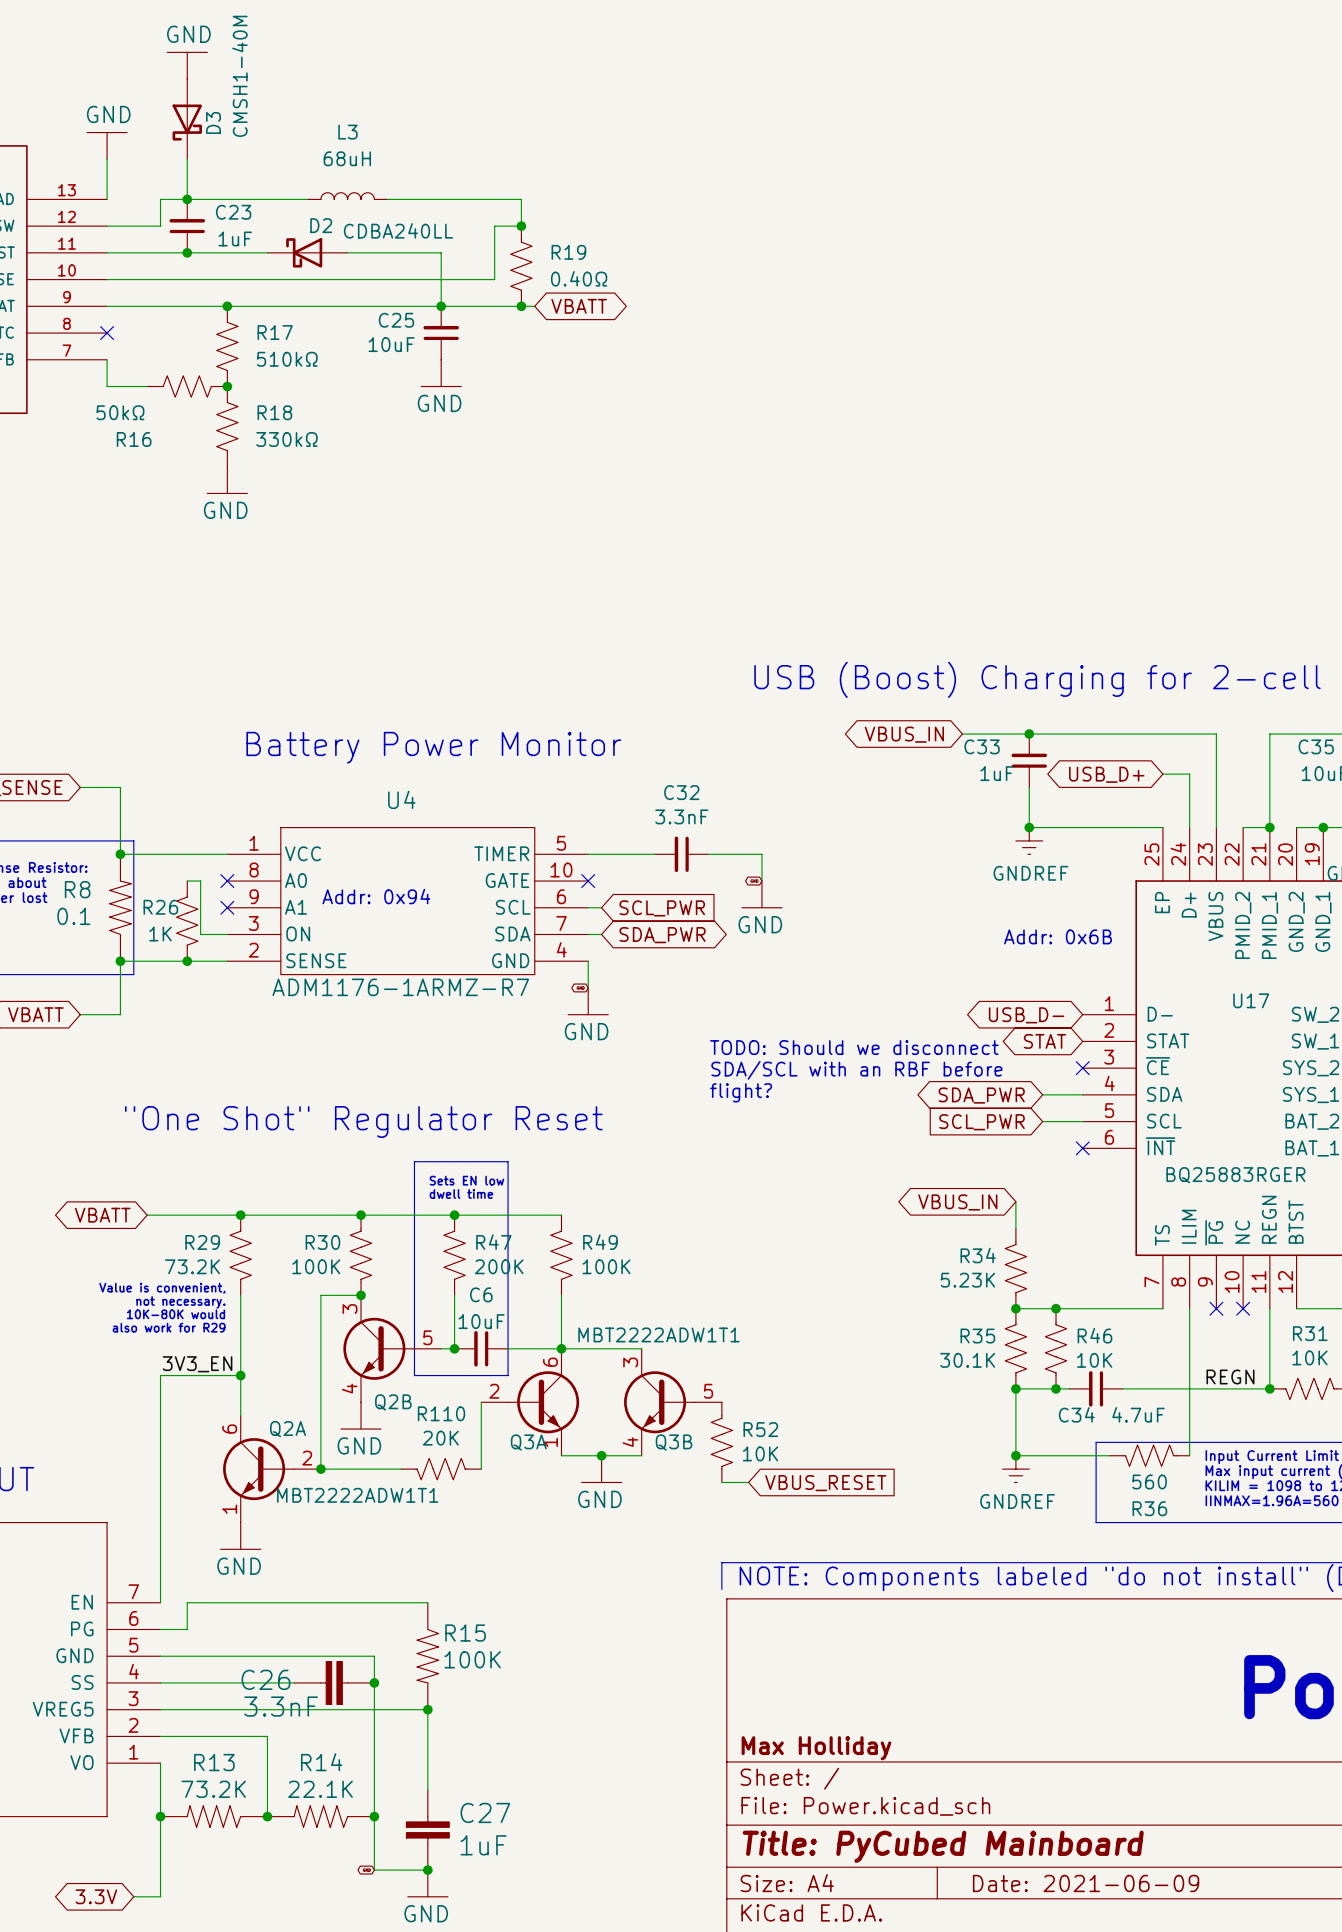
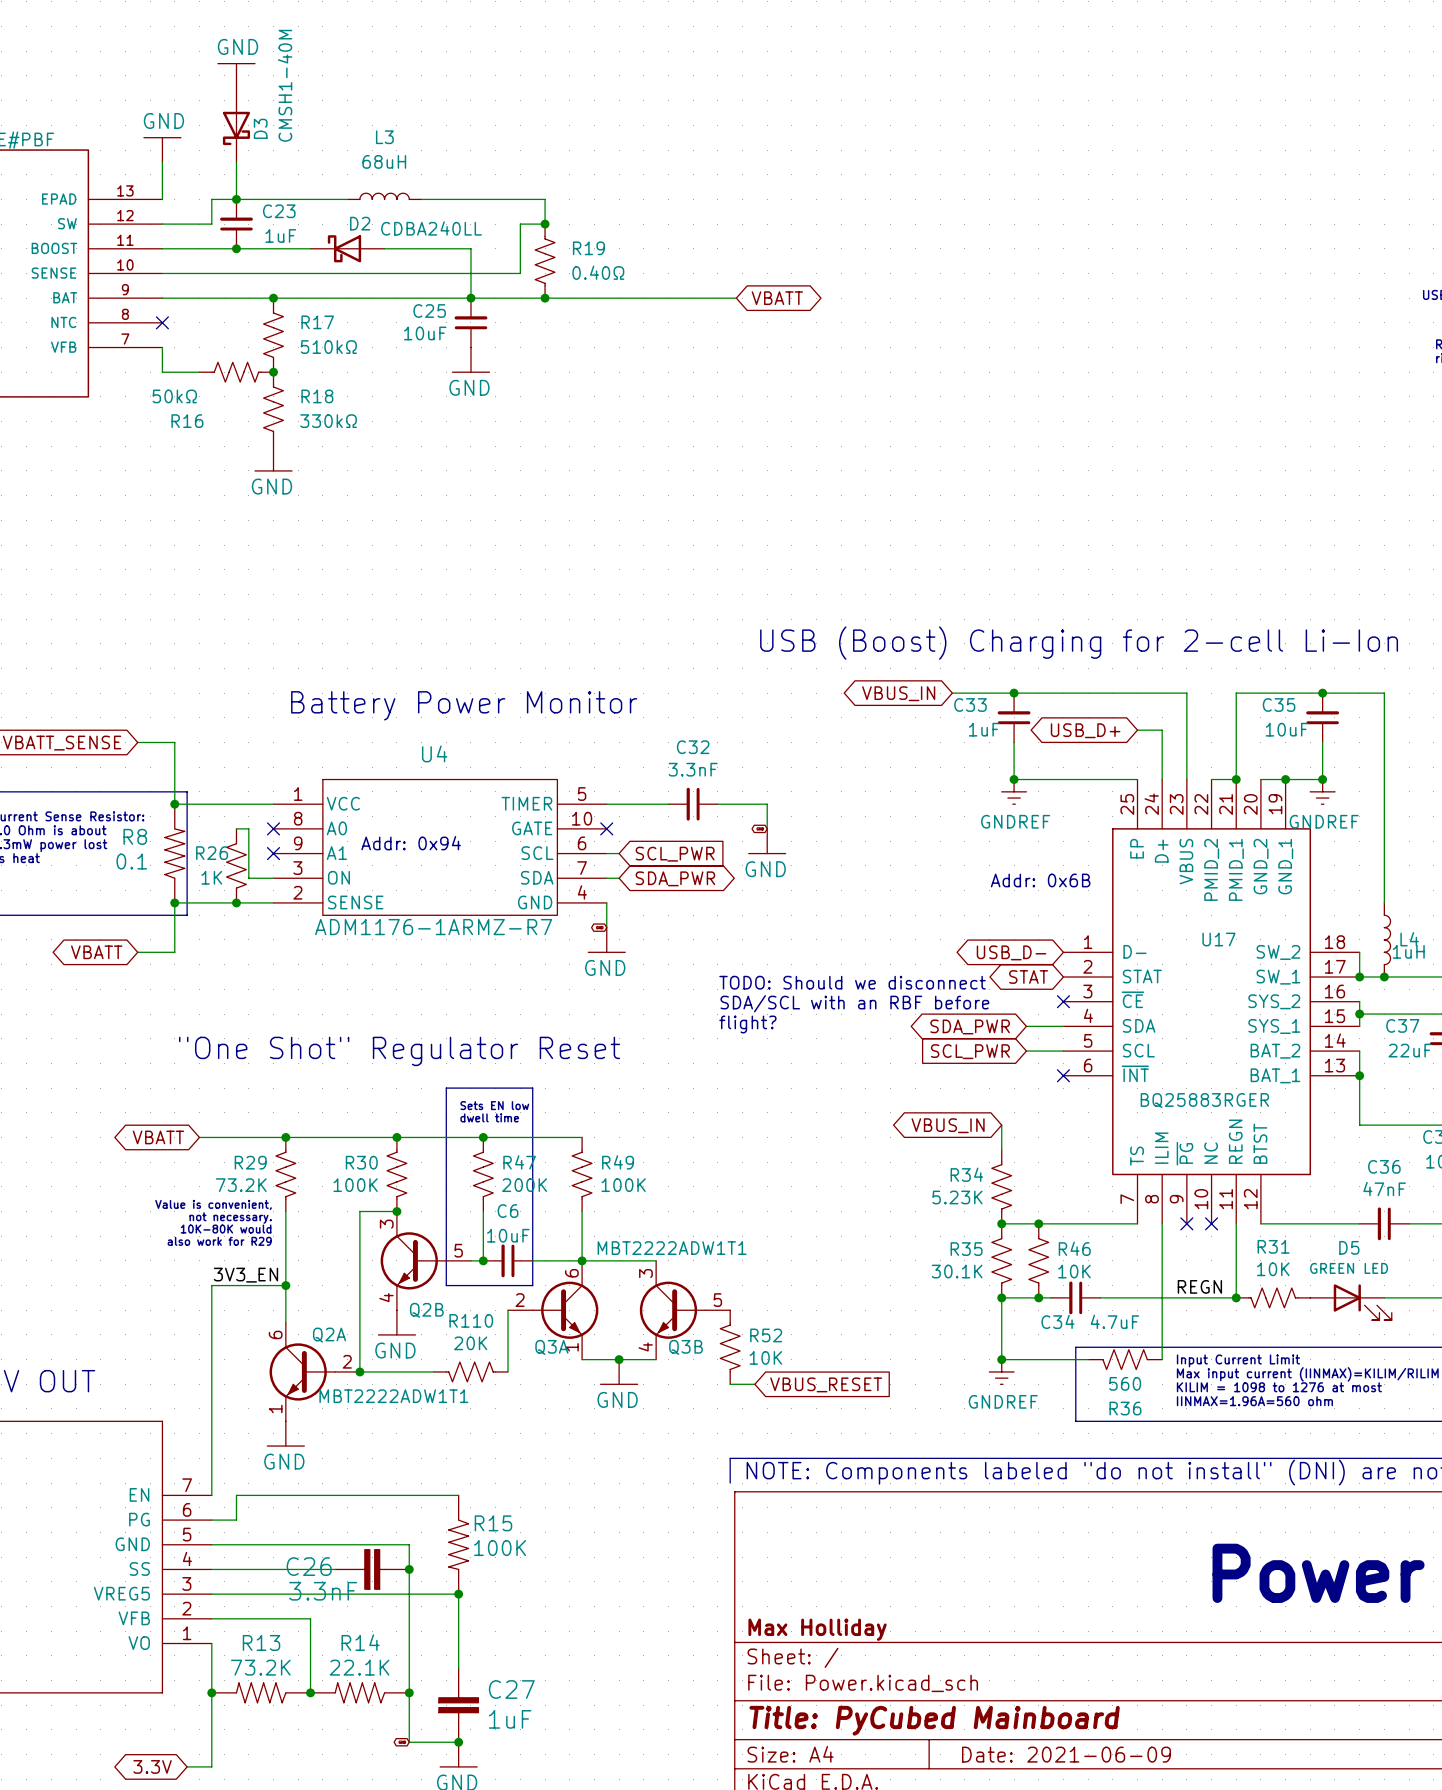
wire: none -> (557, 298) (736, 298)
global label position: VBATT (579, 306) -> VBATT (777, 298)

